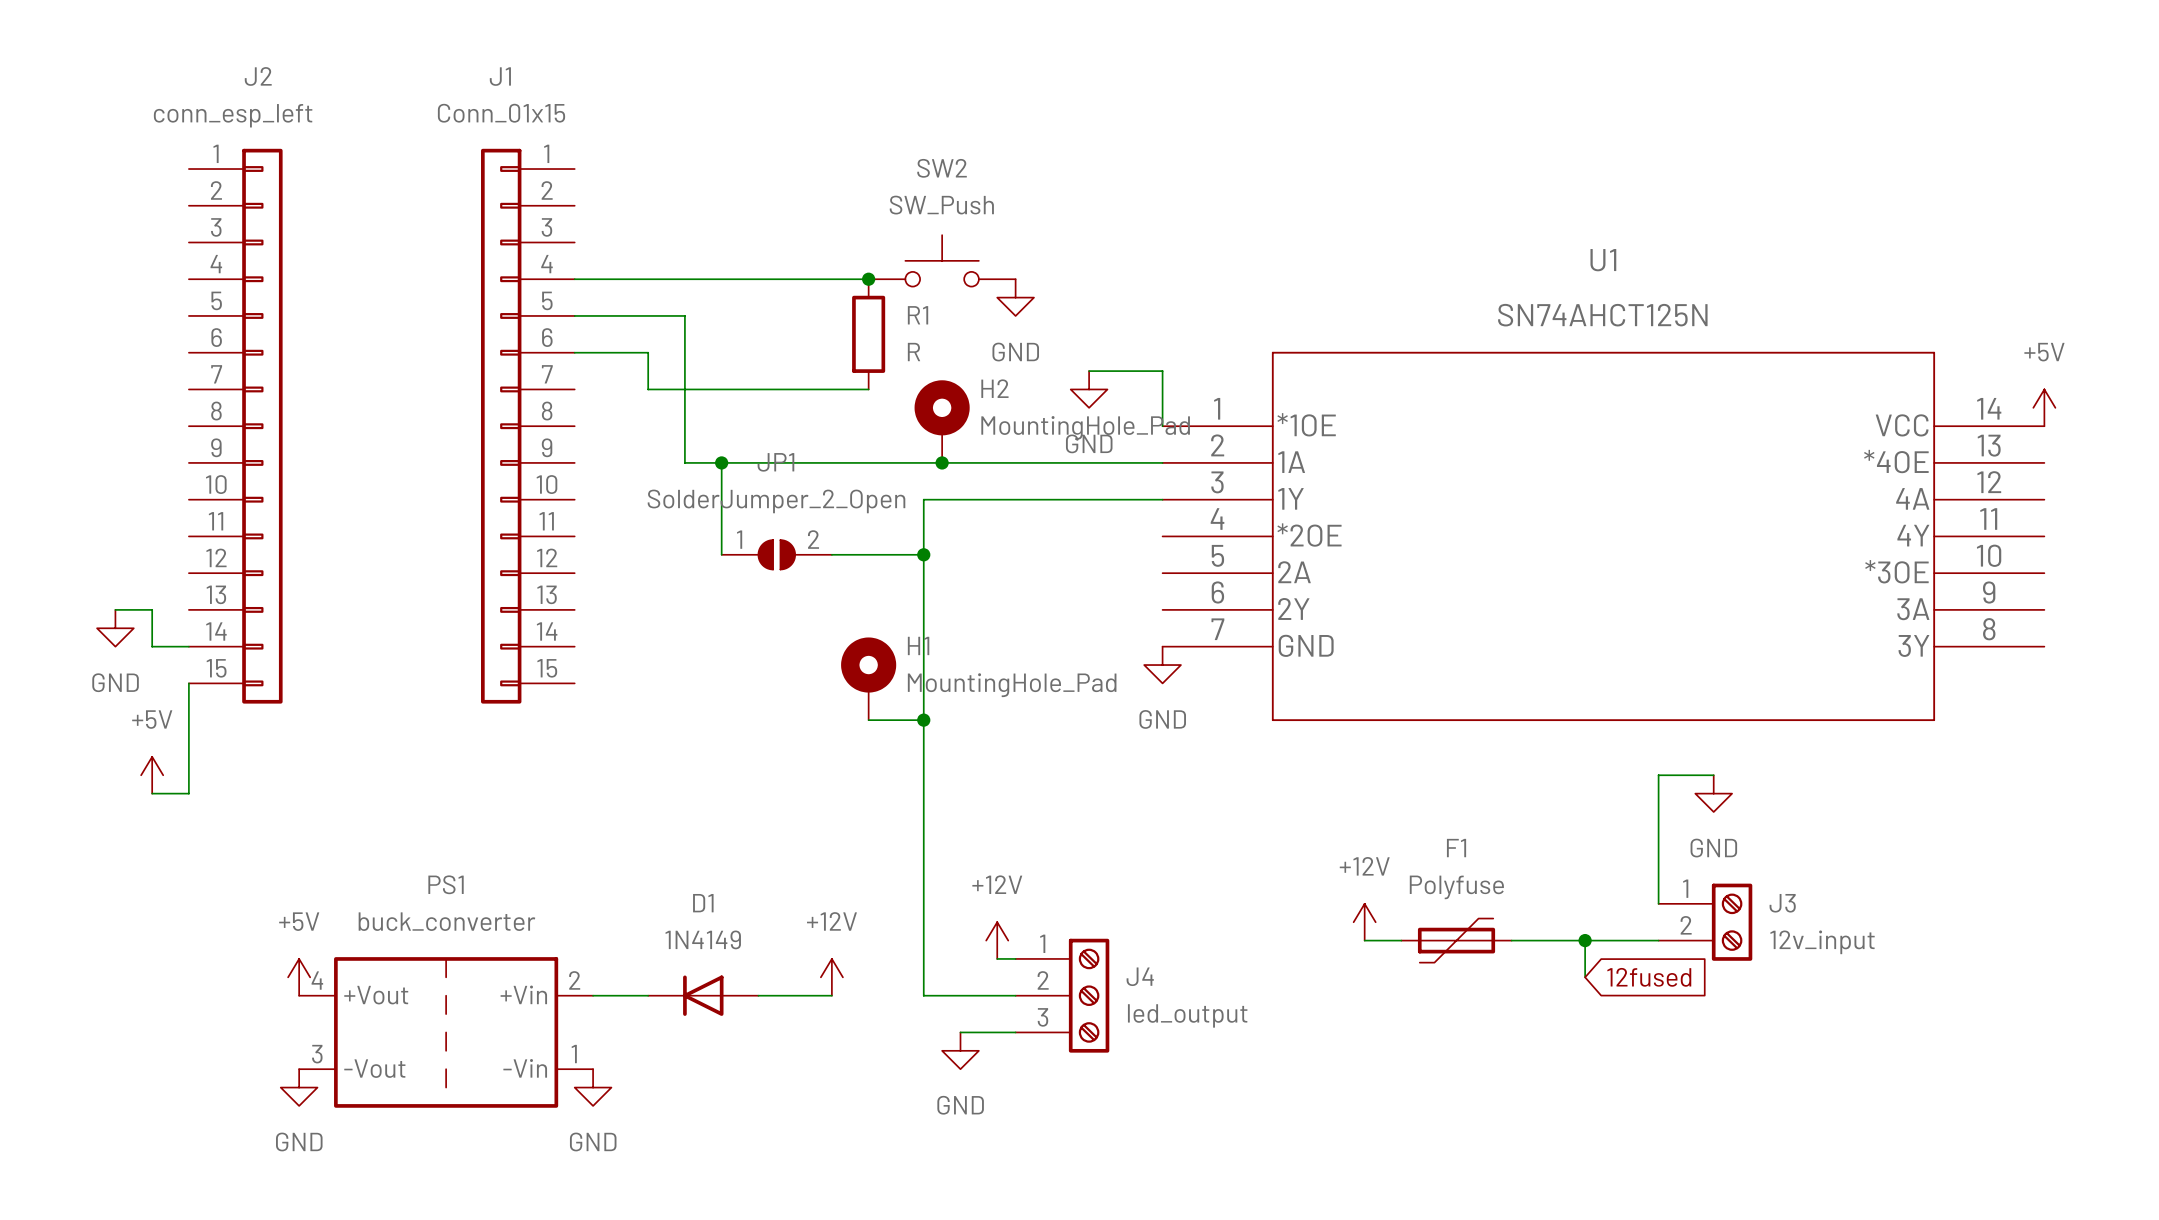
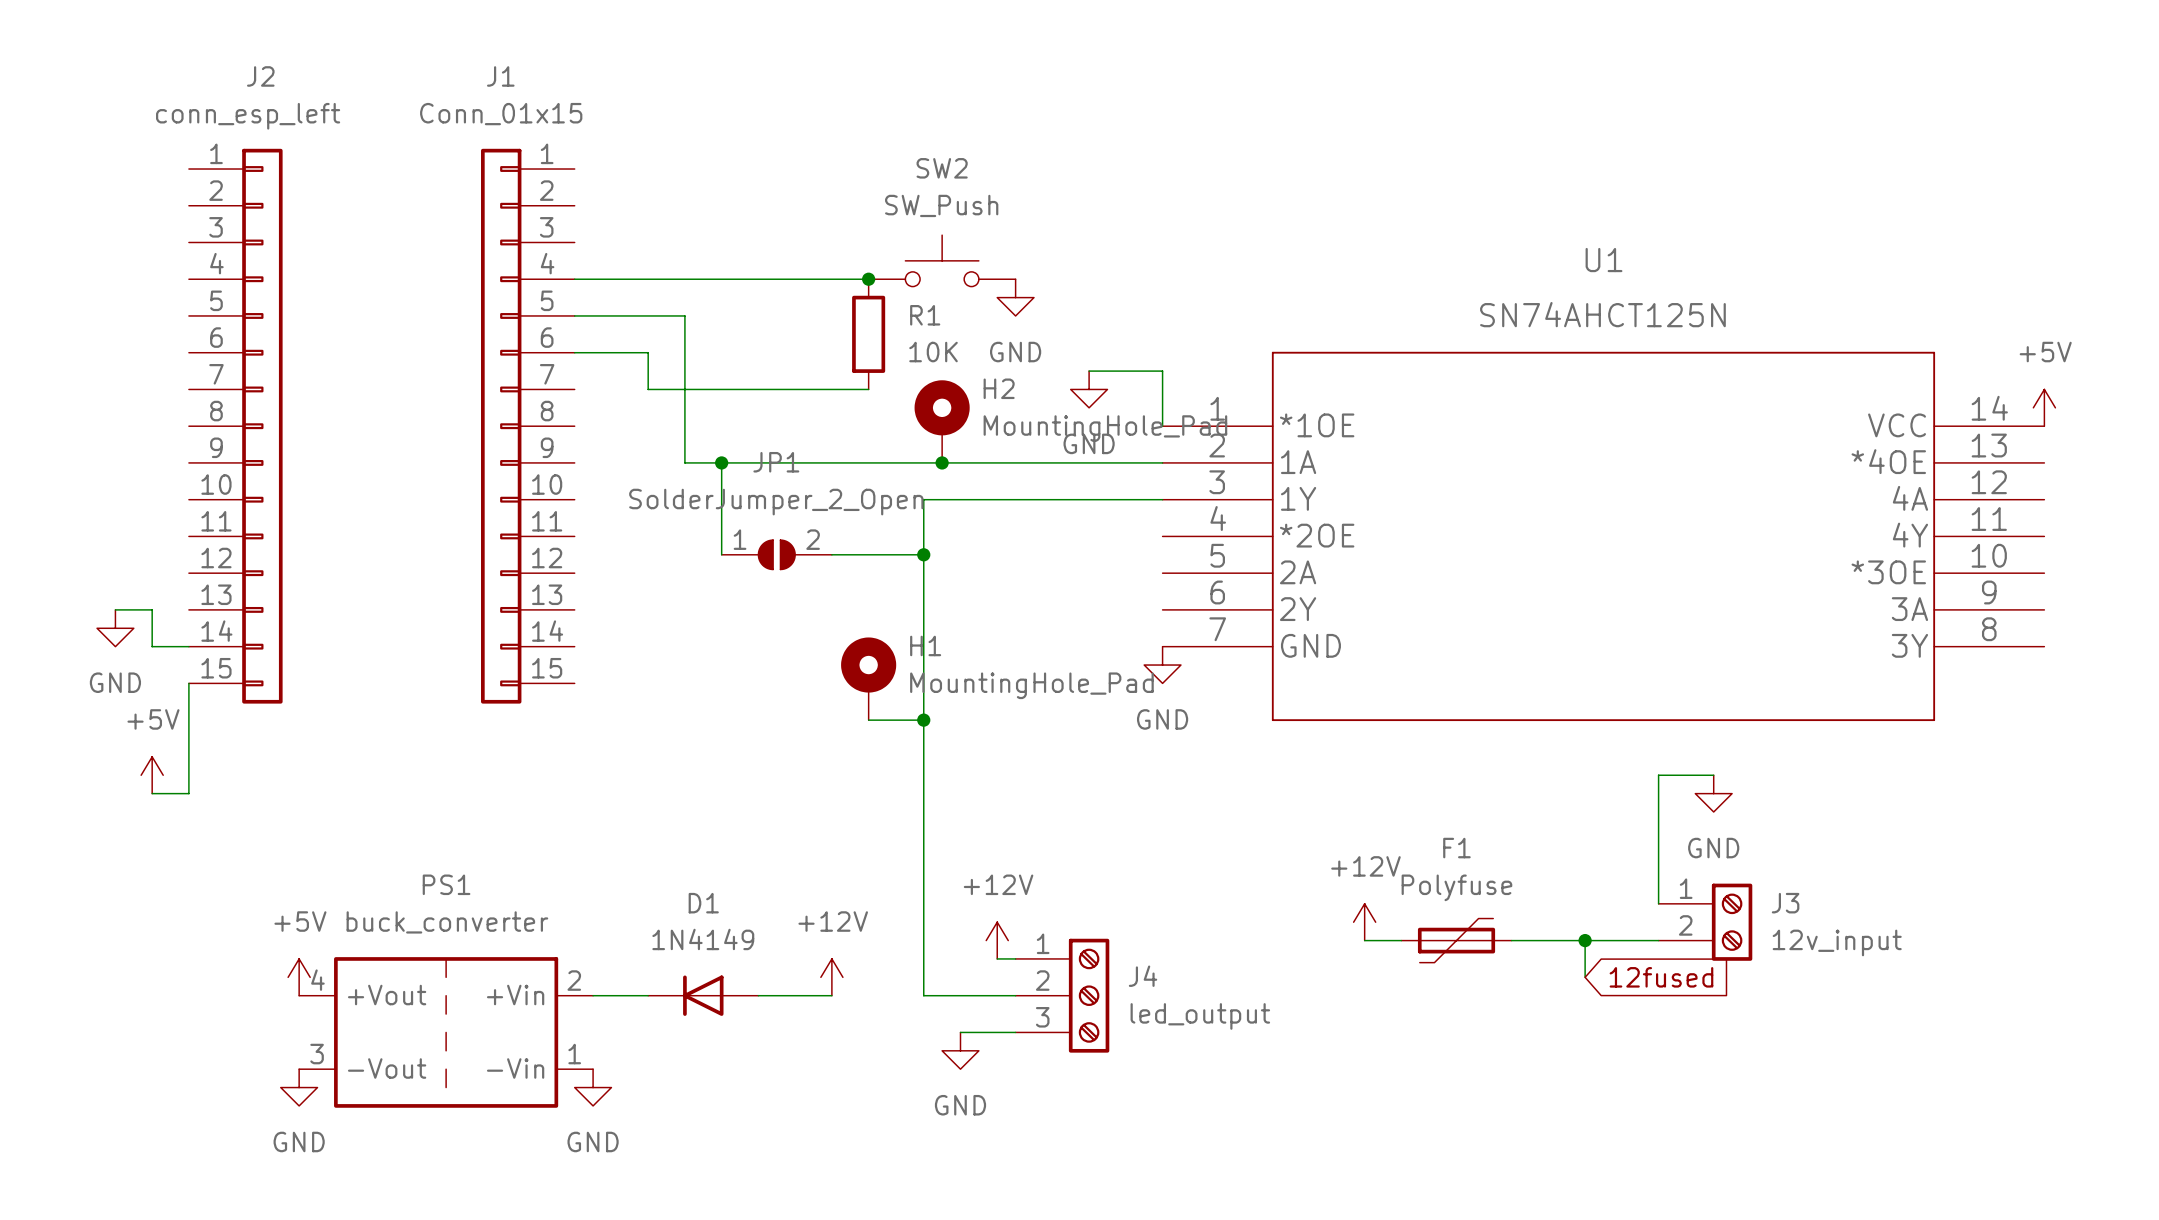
R1 value: R (914, 352) -> 10K (933, 352)

